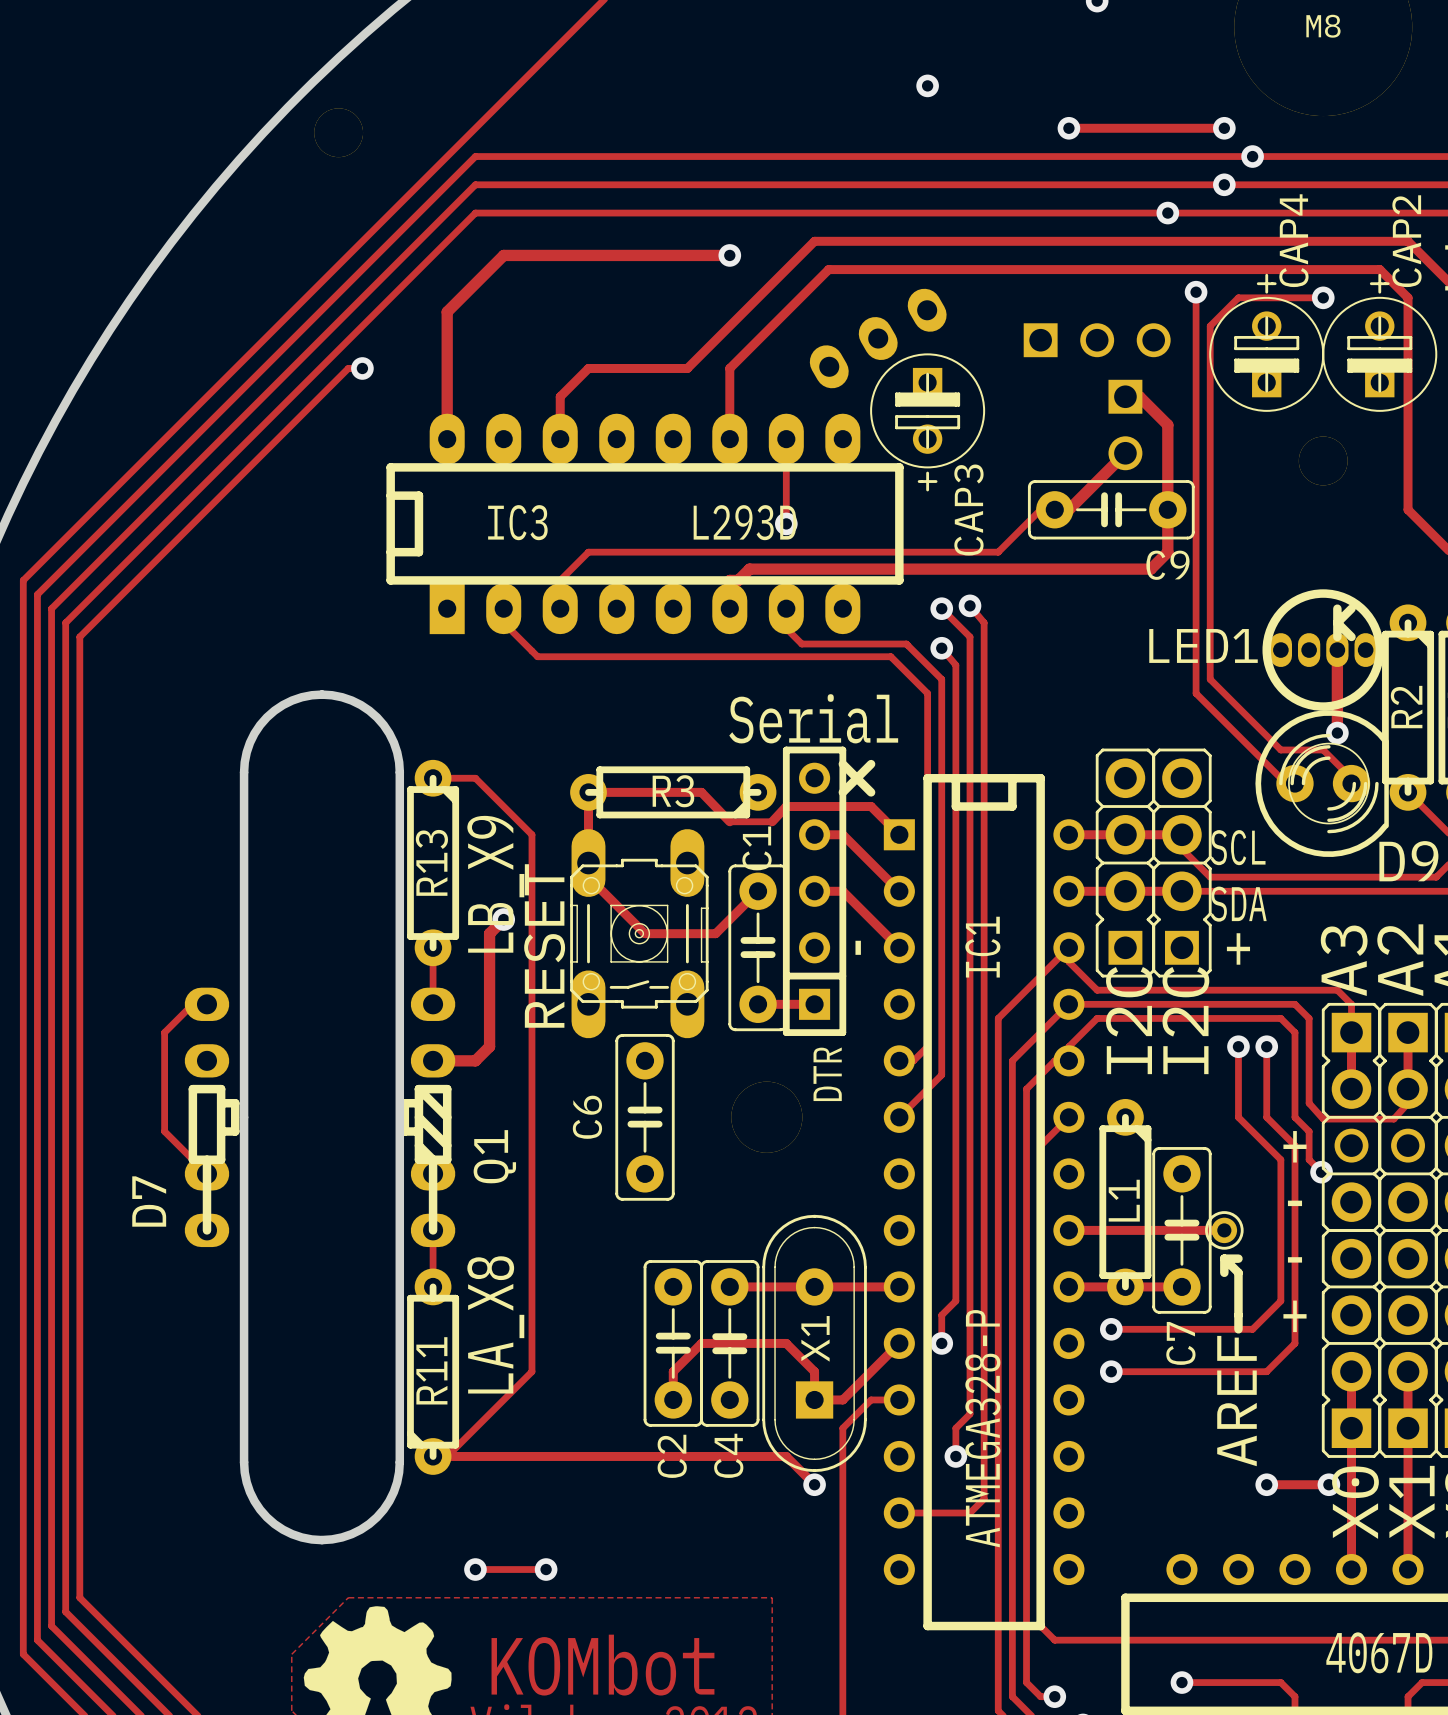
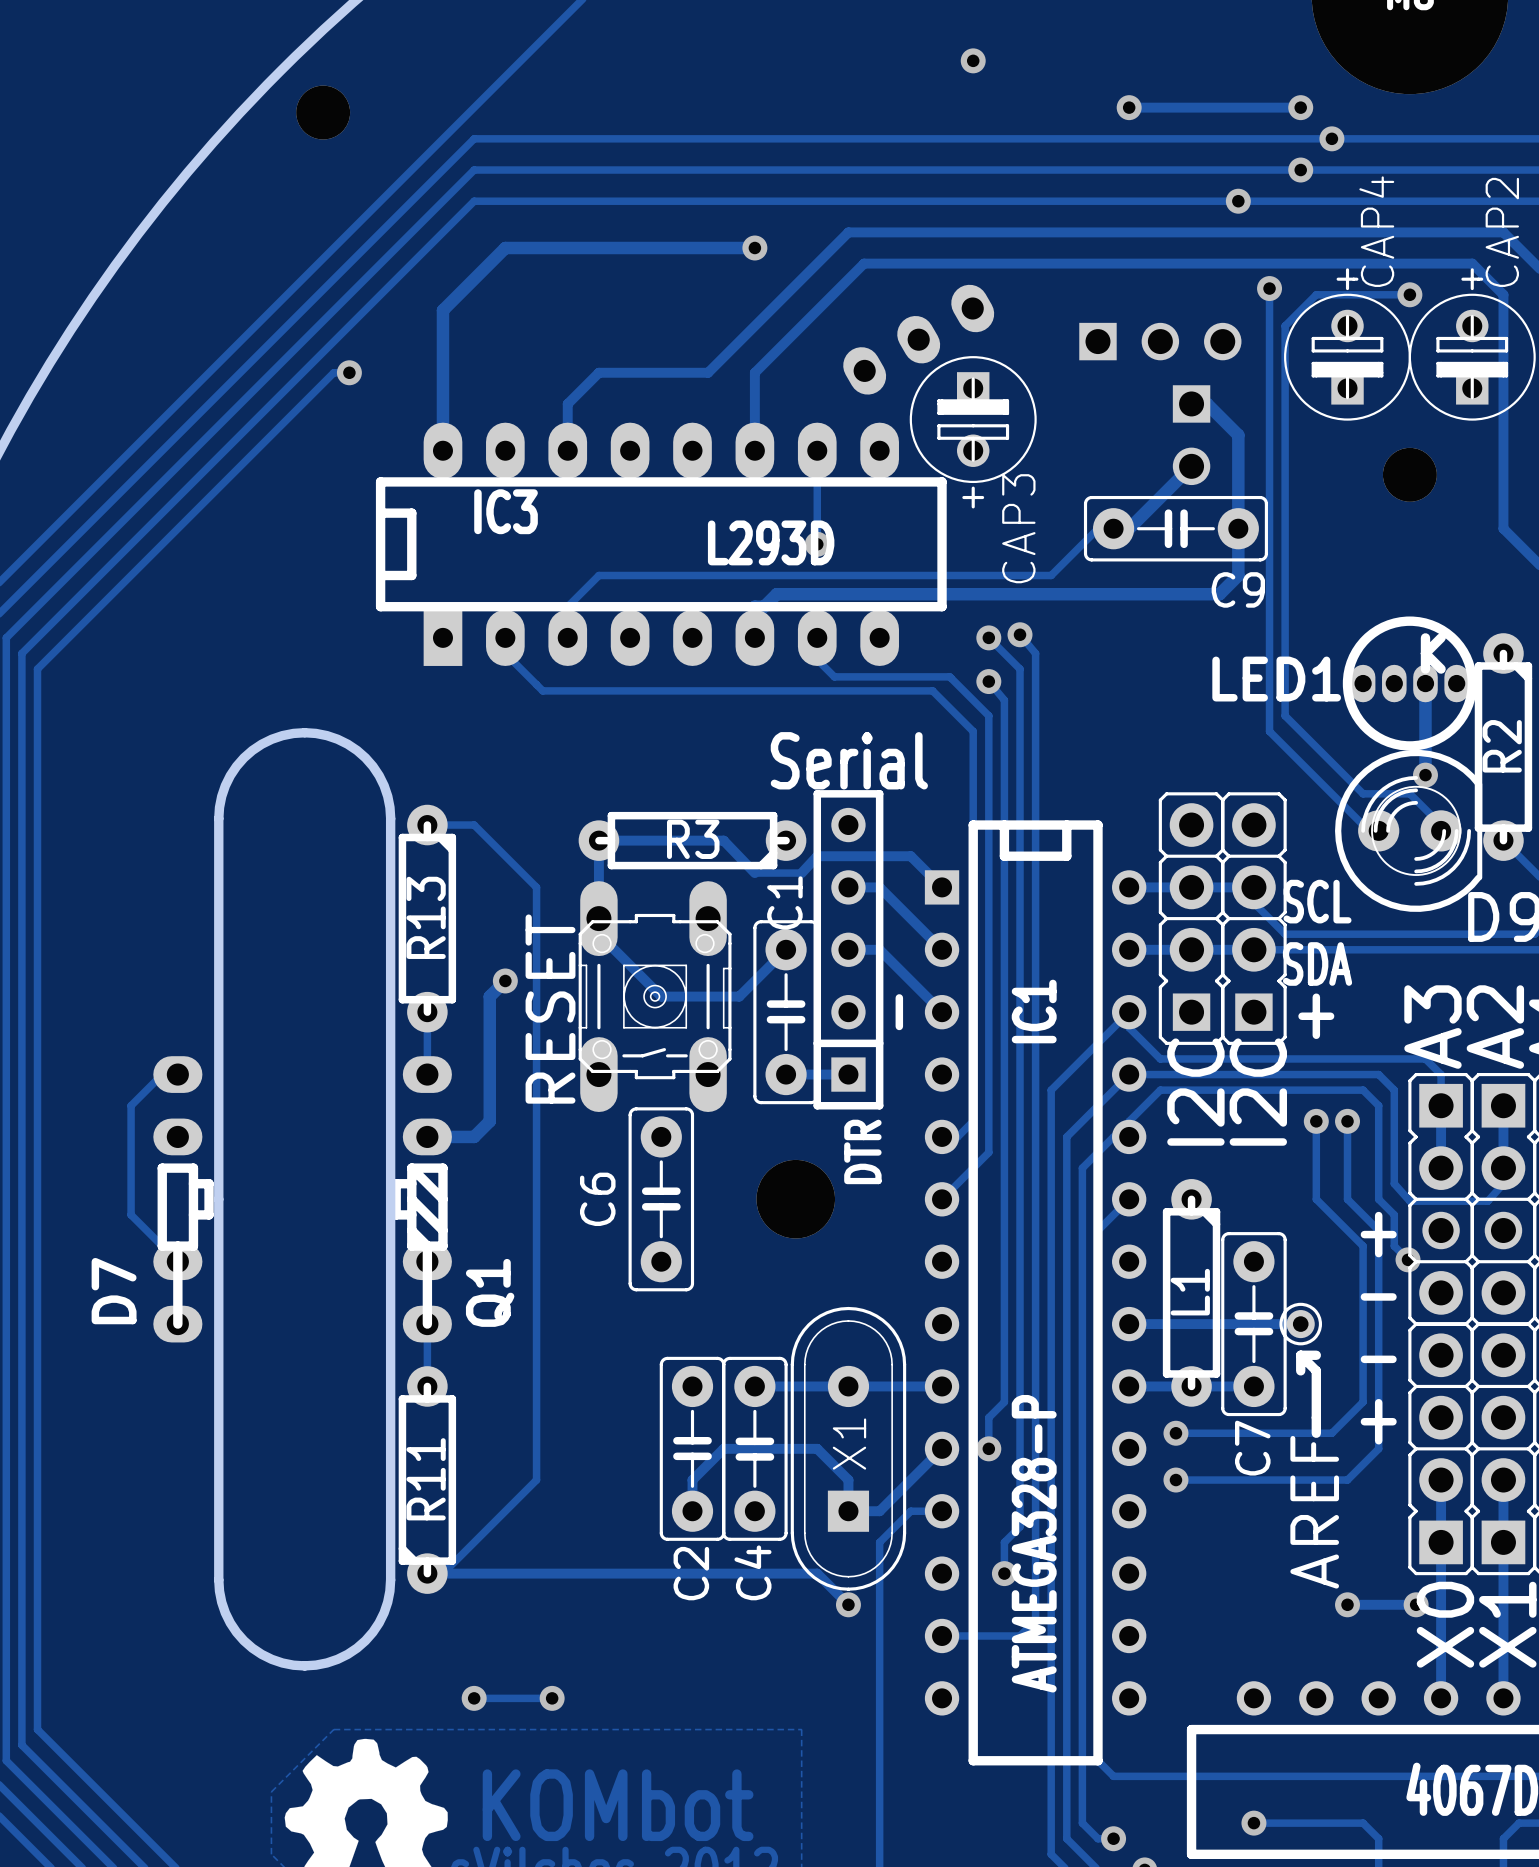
IC3 name position: IC3 (517, 522) -> IC3 (506, 511)
line: (842, 764) (871, 792) -> none
line: (871, 764) (842, 792) -> none
text: LB_X9 (495, 884) -> none
Q1 name position: Q1 (494, 1156) -> Q1 (490, 1292)
text: LA_X8 (495, 1324) -> none

